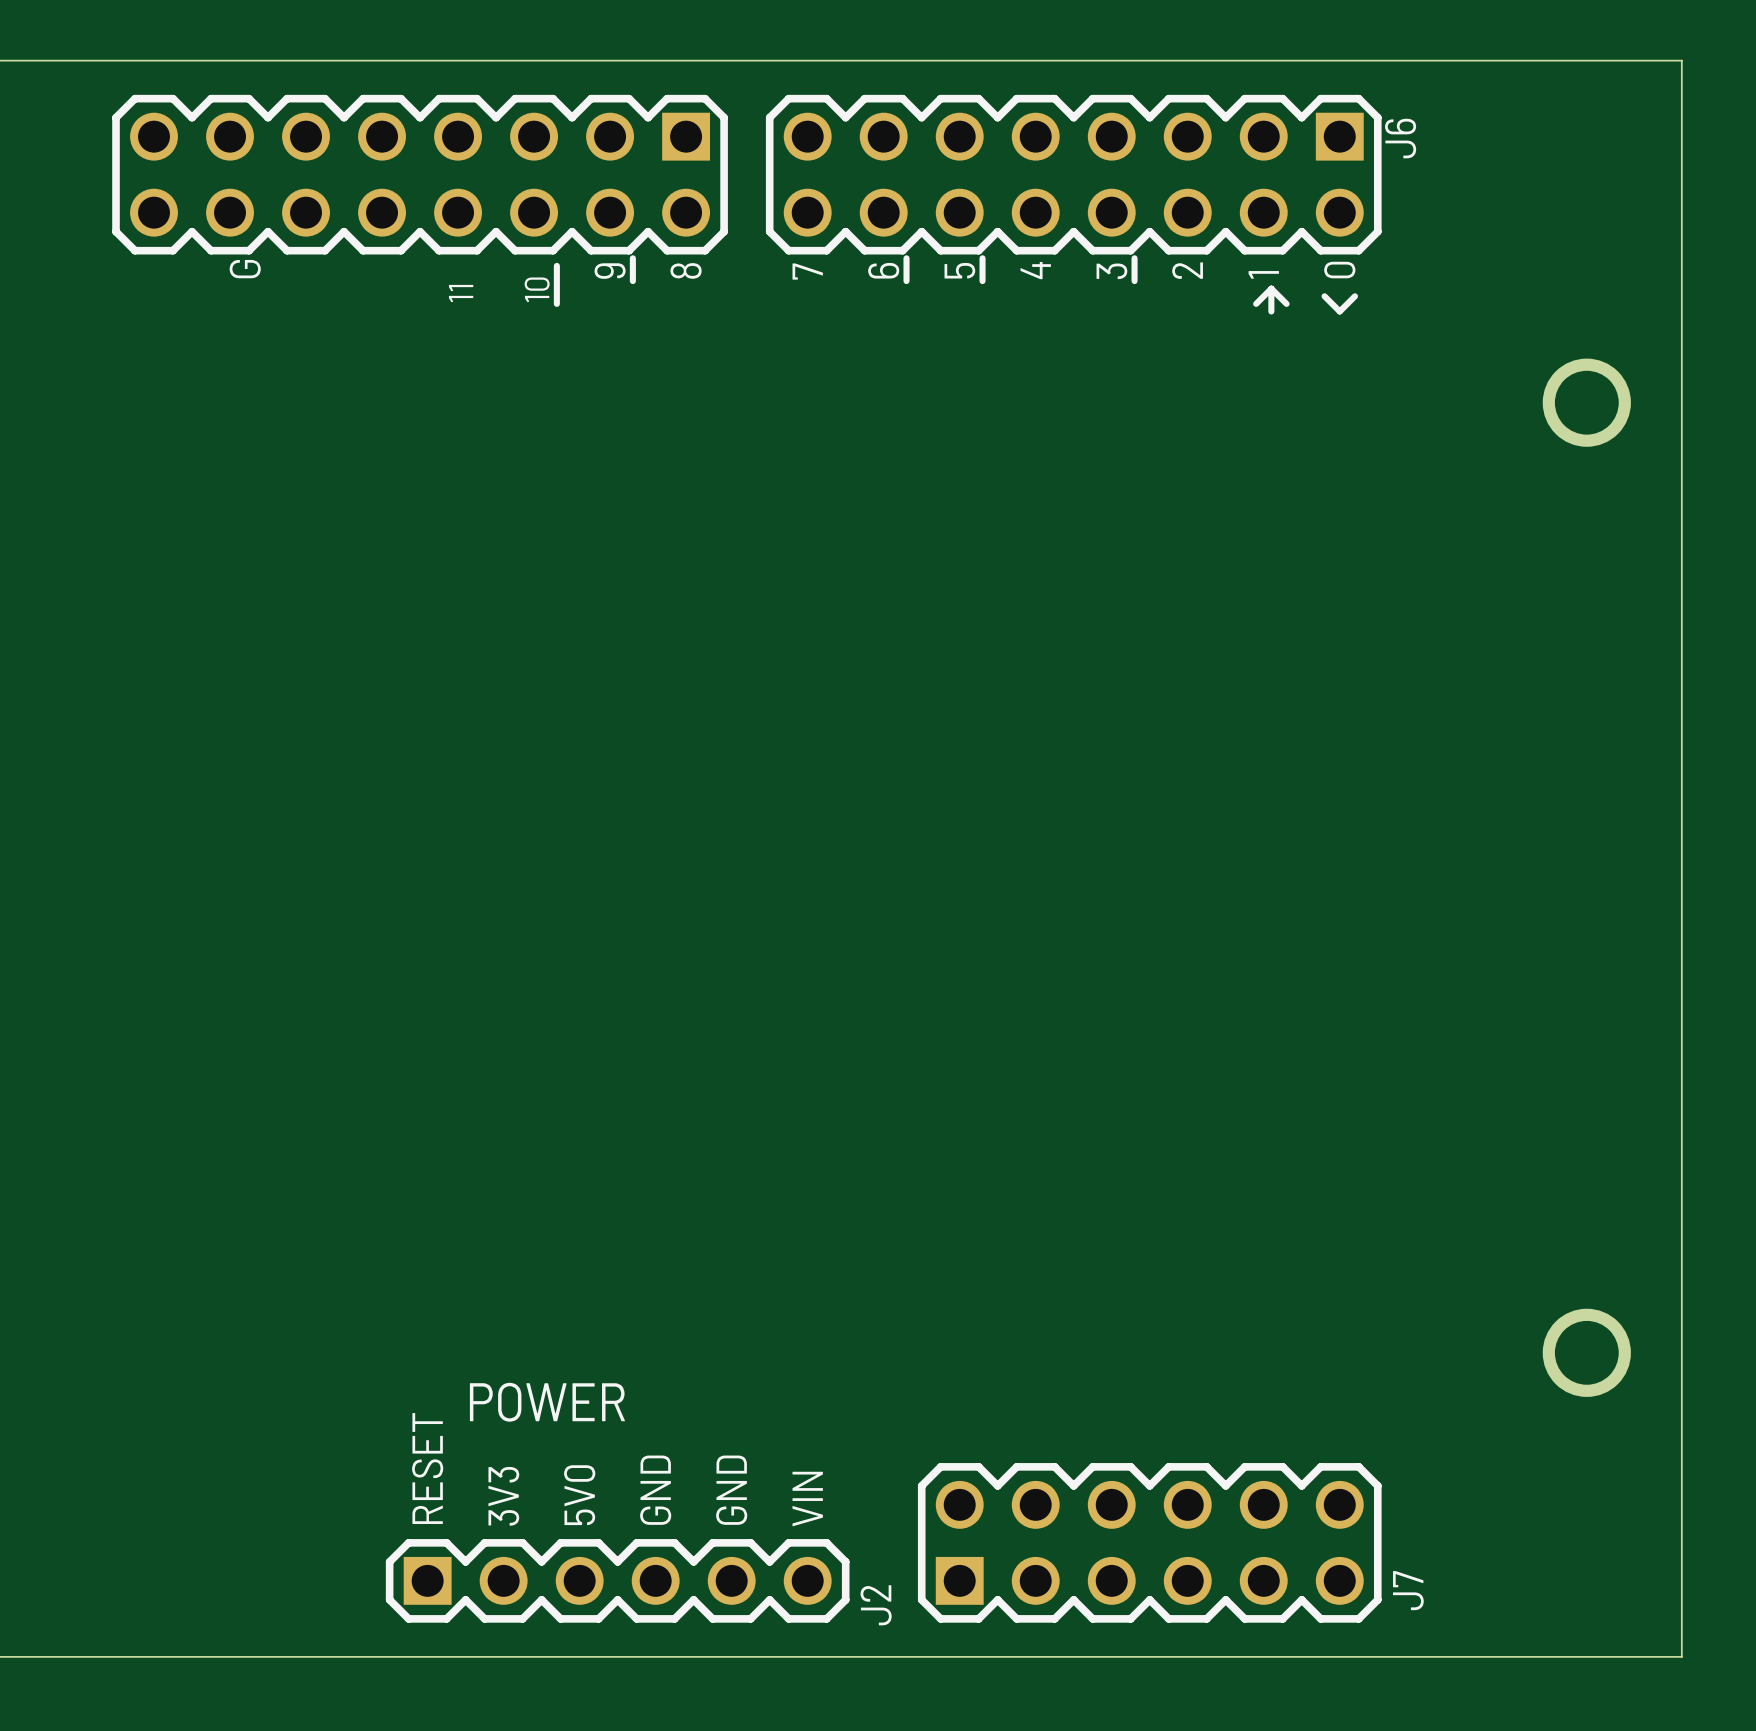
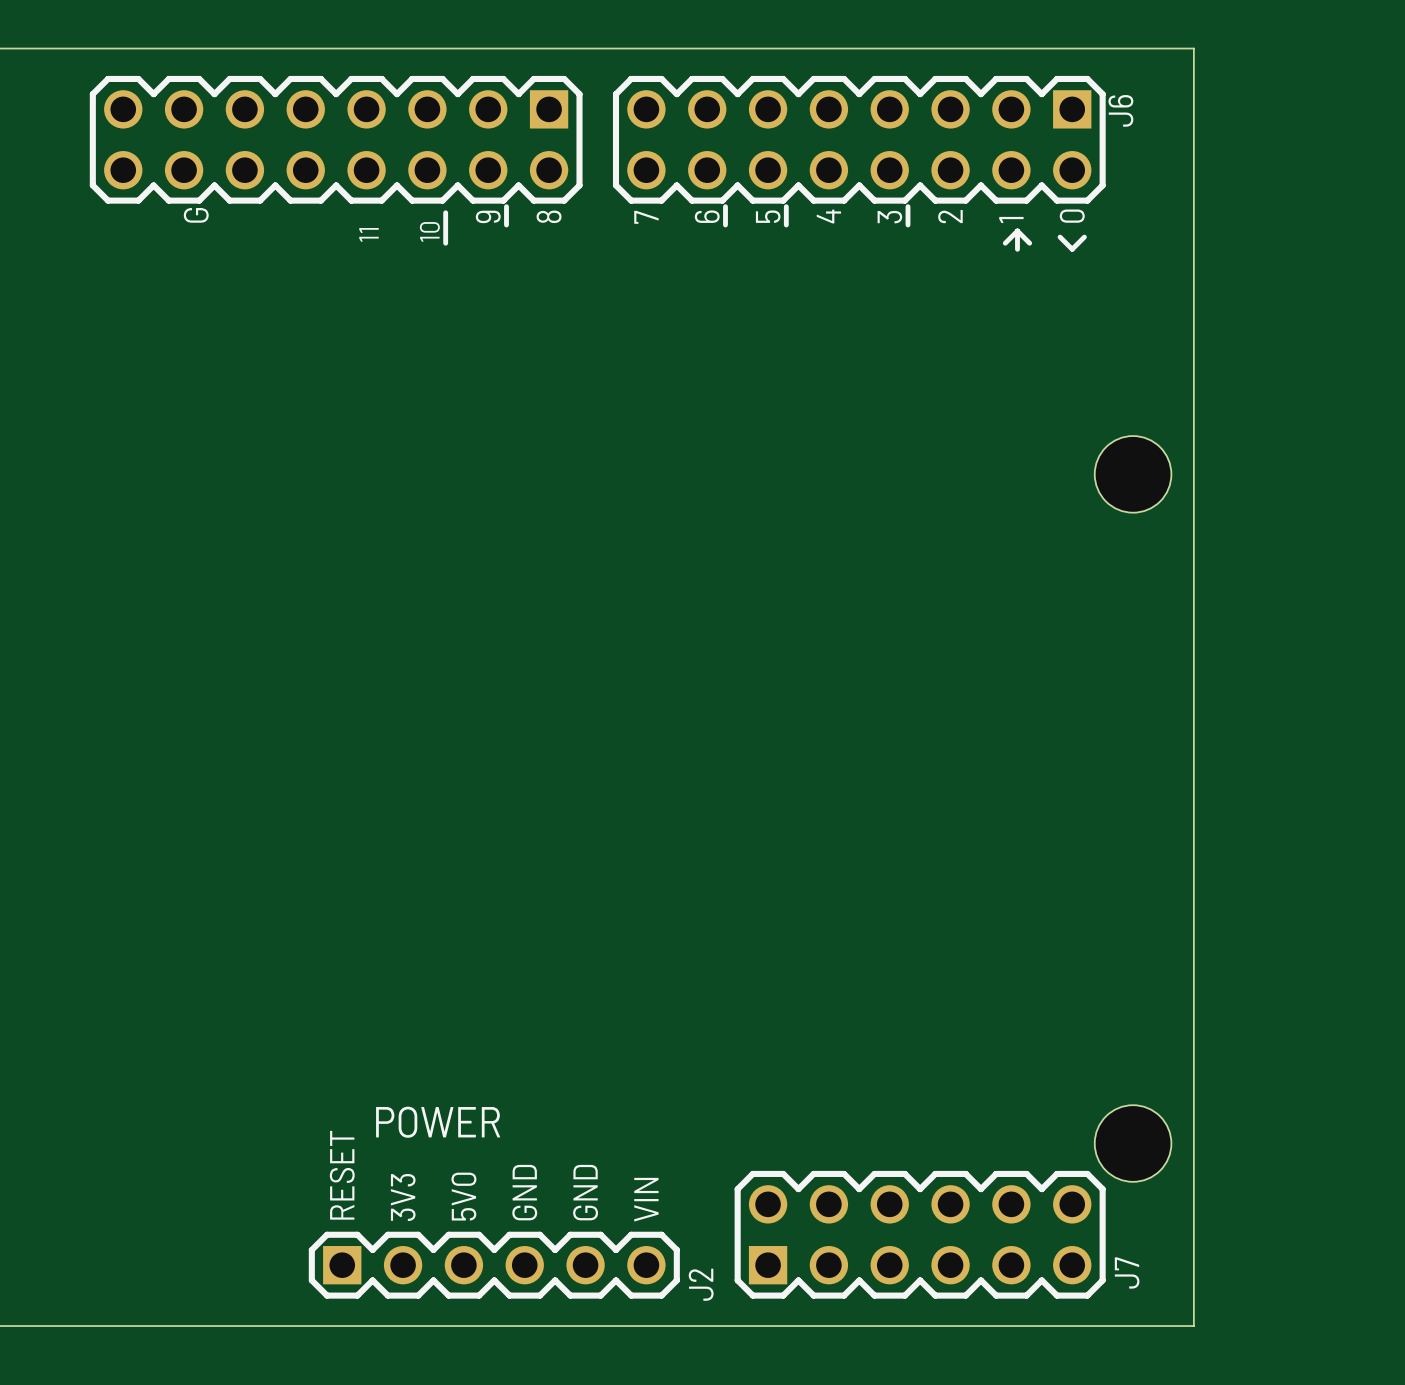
board edge: (1491, 60) (1681, 60) (1681, 1656) (1491, 1656) -> (1193, 48) (1193, 1326)
round board edge: [1542, 358, 1631, 447] -> none
hole: none -> (1133, 474)
round board edge: [1542, 1308, 1631, 1397] -> none
hole: none -> (1133, 1143)

